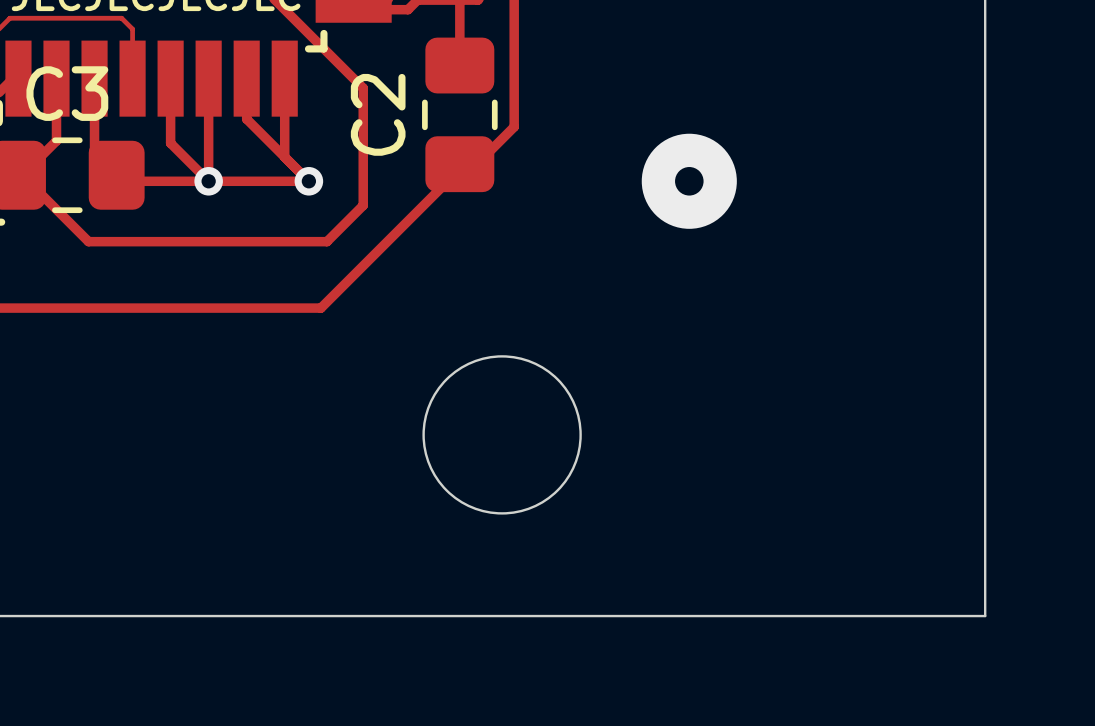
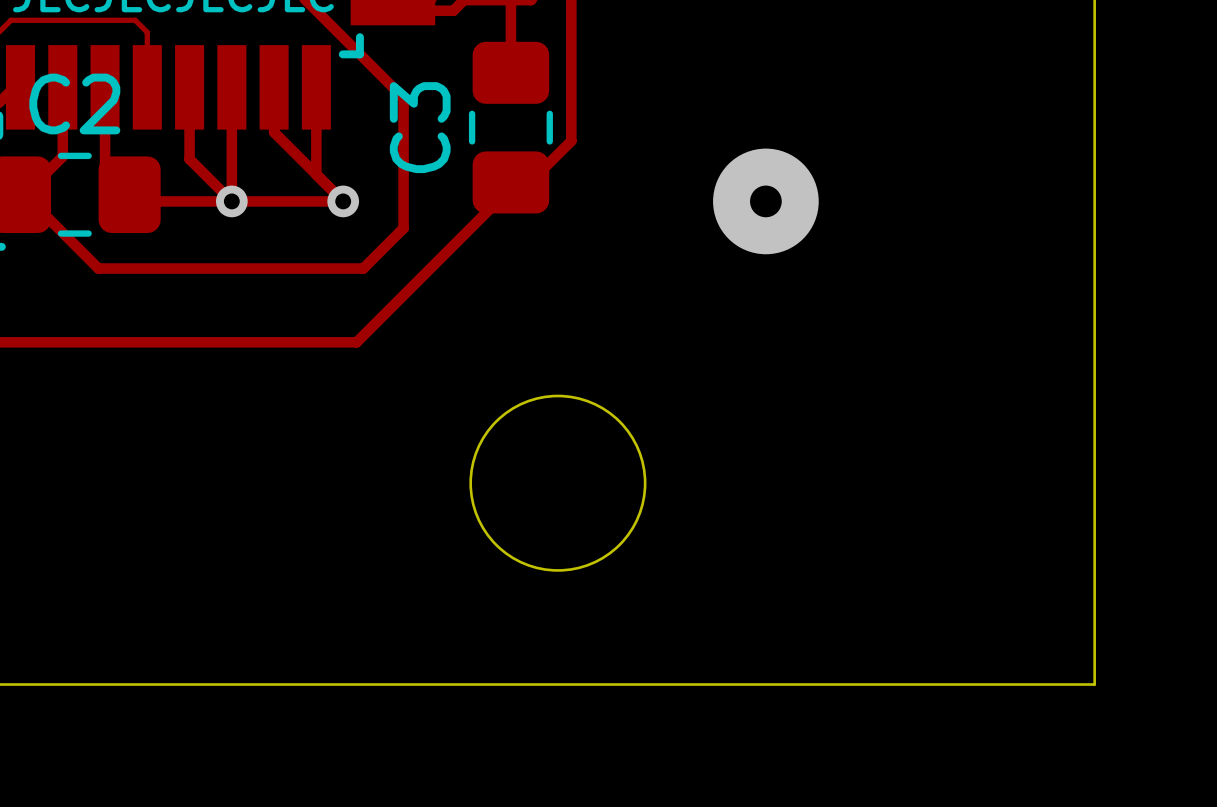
C3 name: C3 (67, 93) -> C2 (74, 103)
C2 name: C2 (378, 114) -> C3 (420, 127)

